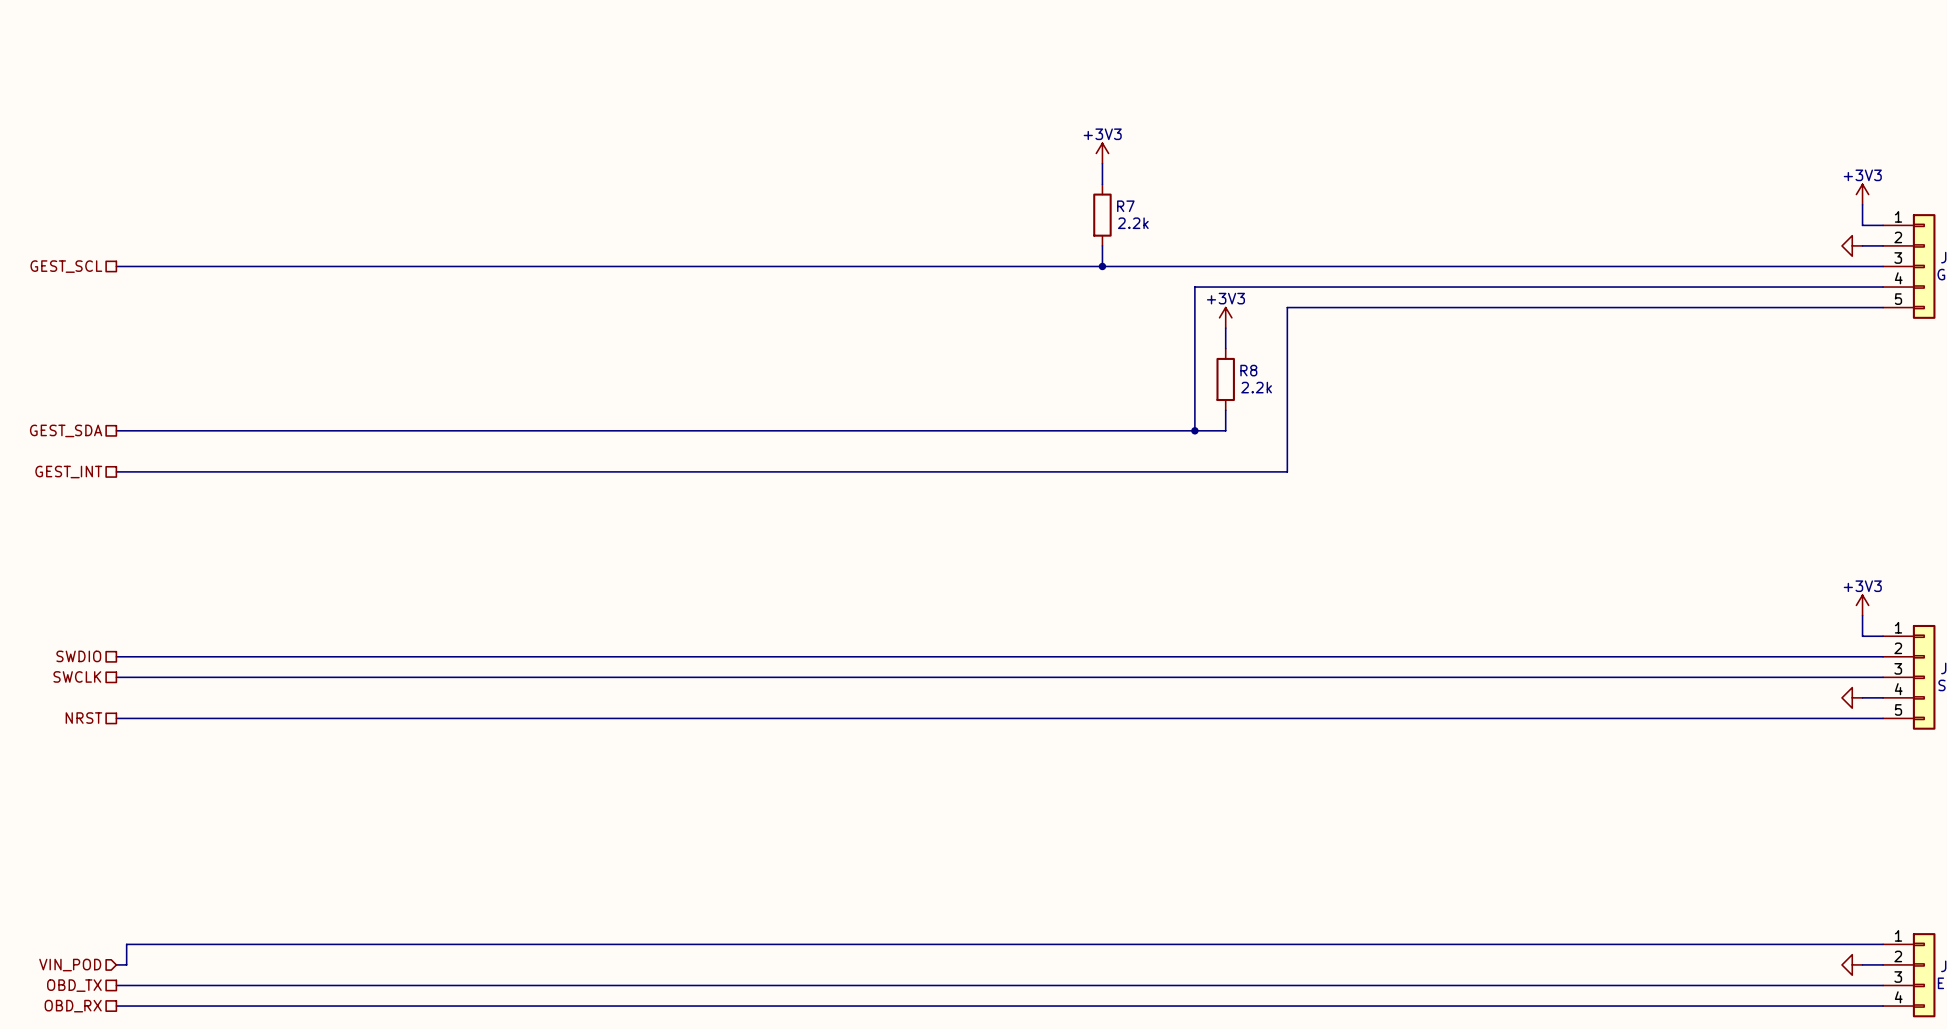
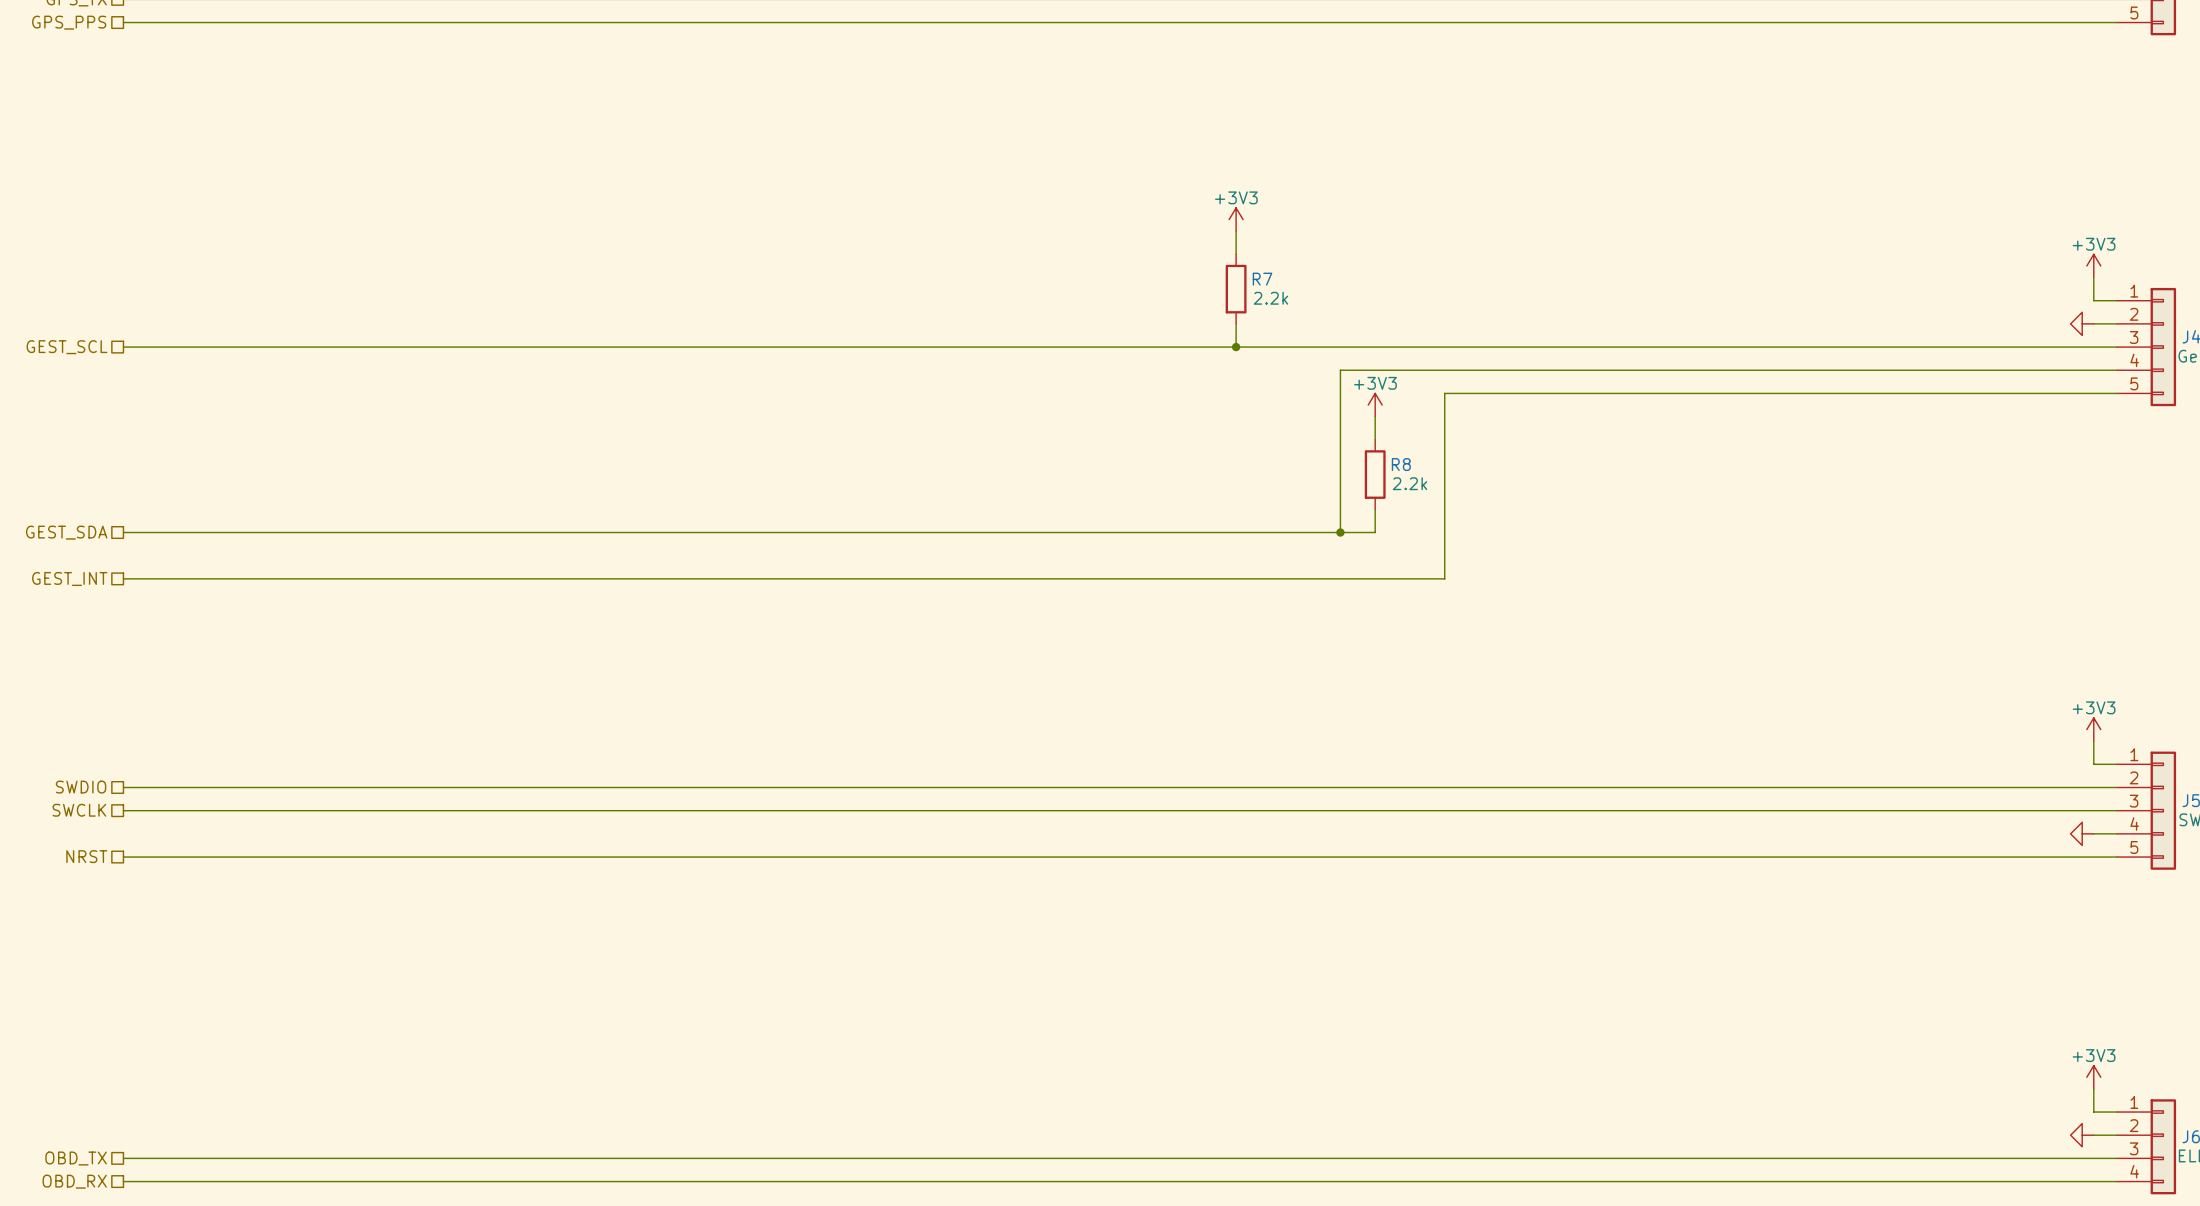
power symbol: none -> +3V3 (2093, 1077)
wire: (1862, 944) (126, 944) (126, 964) (116, 964) -> (2093, 1112) (2093, 1088)
hierarchical label: VIN_POD (70, 965) -> none

